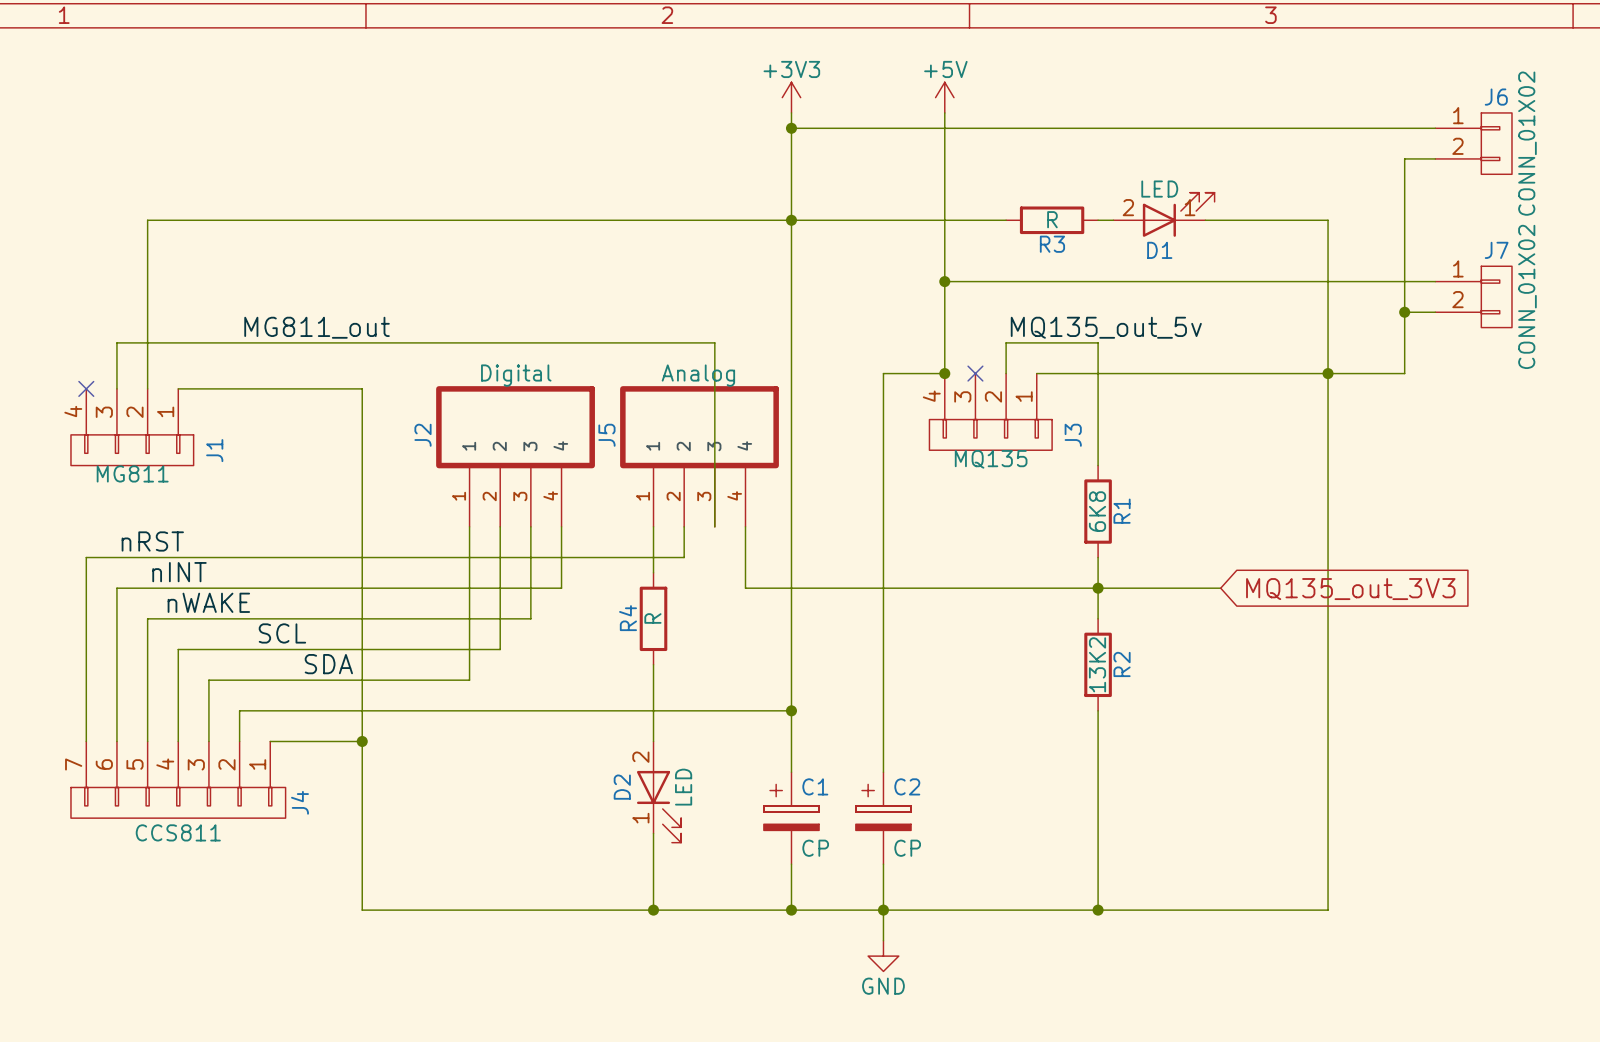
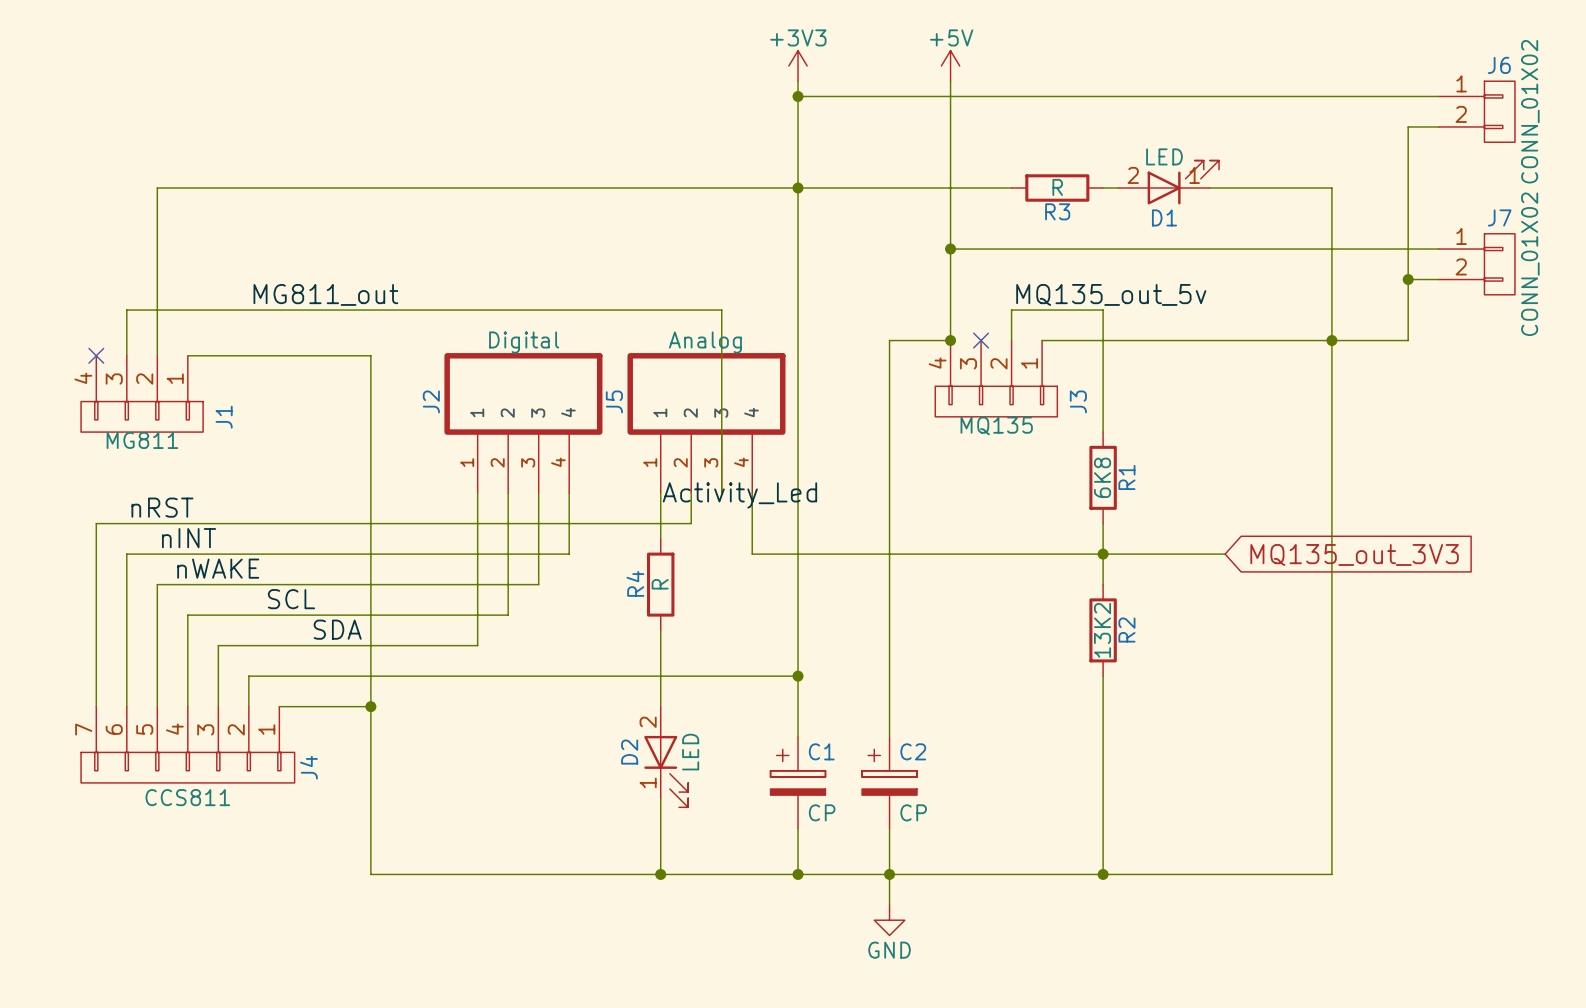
label: none -> Activity_Led (739, 495)

